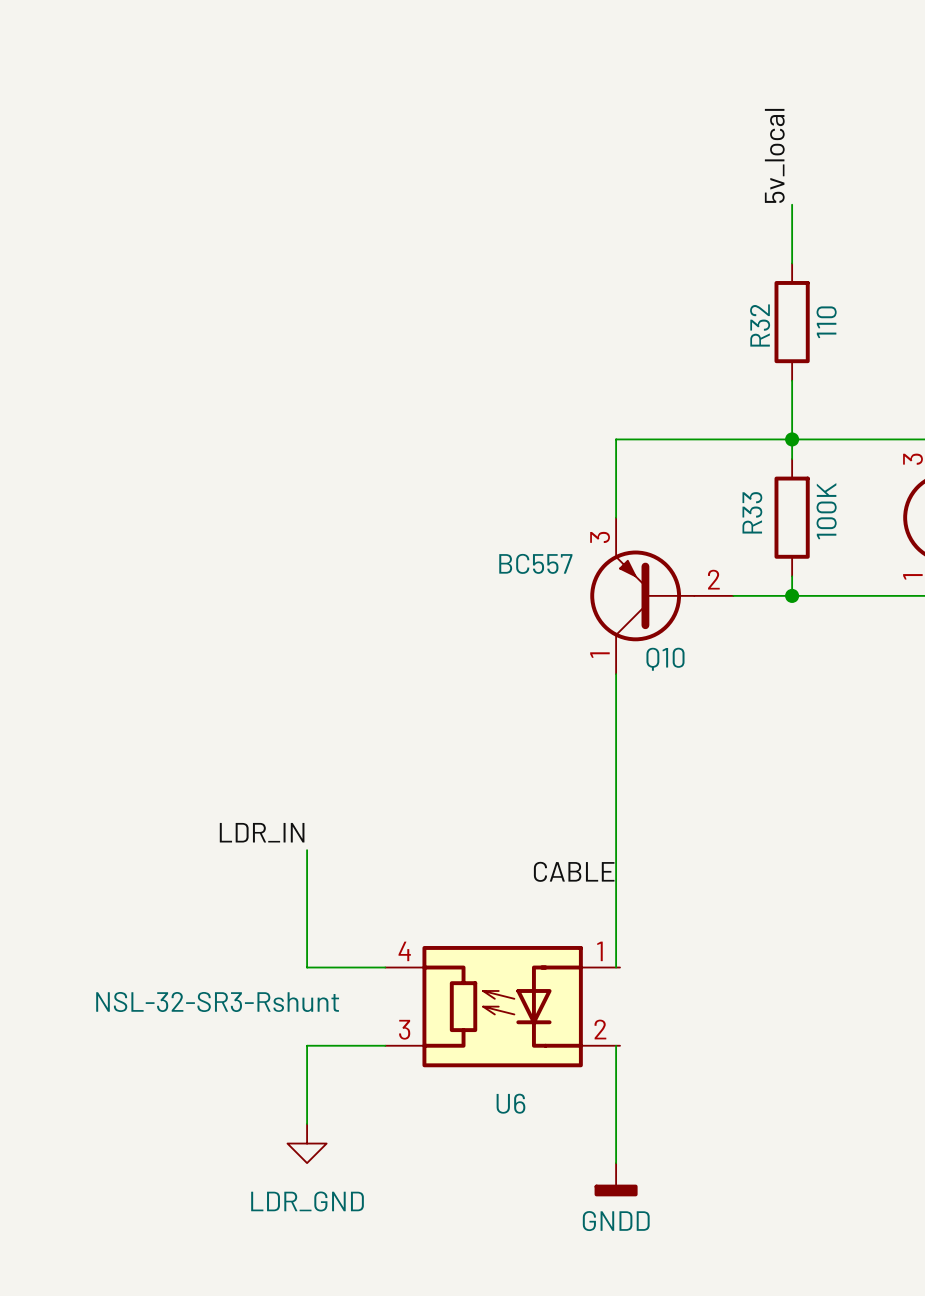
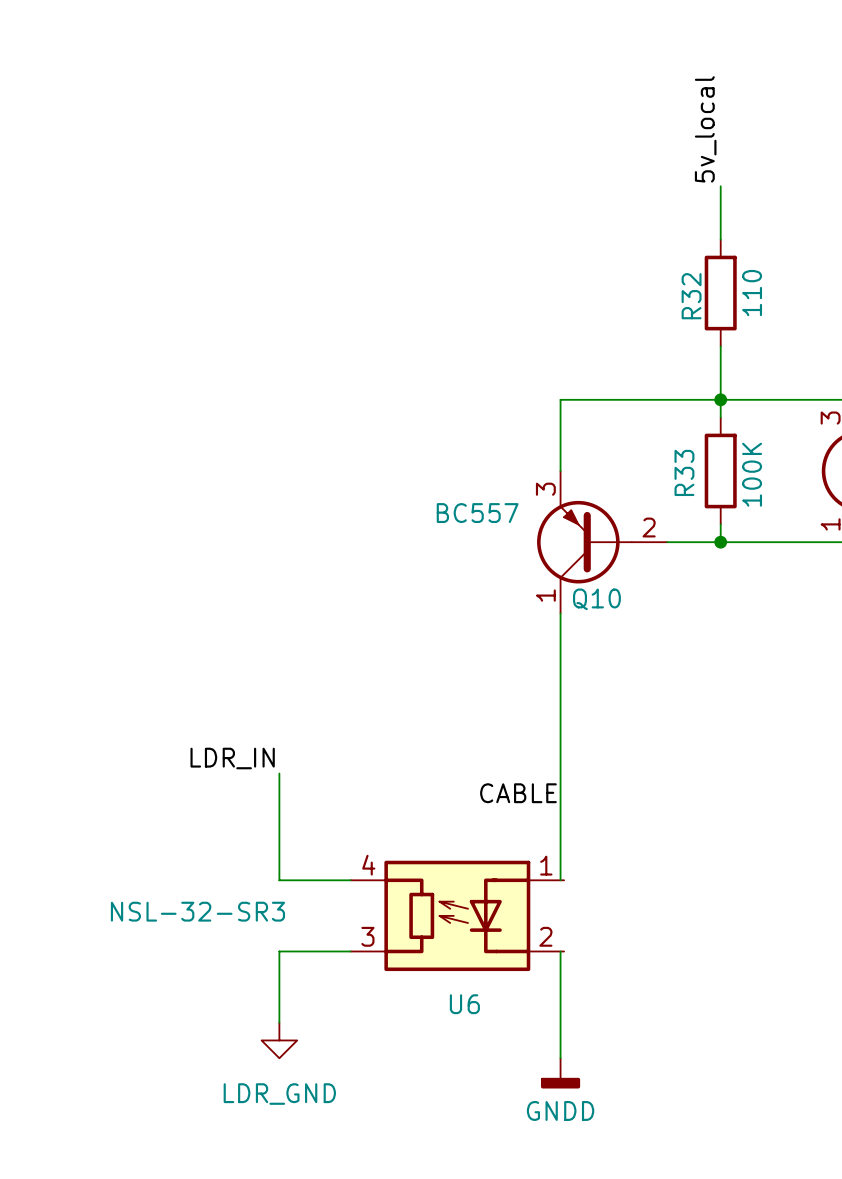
U6 value: NSL-32-SR3-Rshunt (217, 1001) -> NSL-32-SR3 (197, 911)

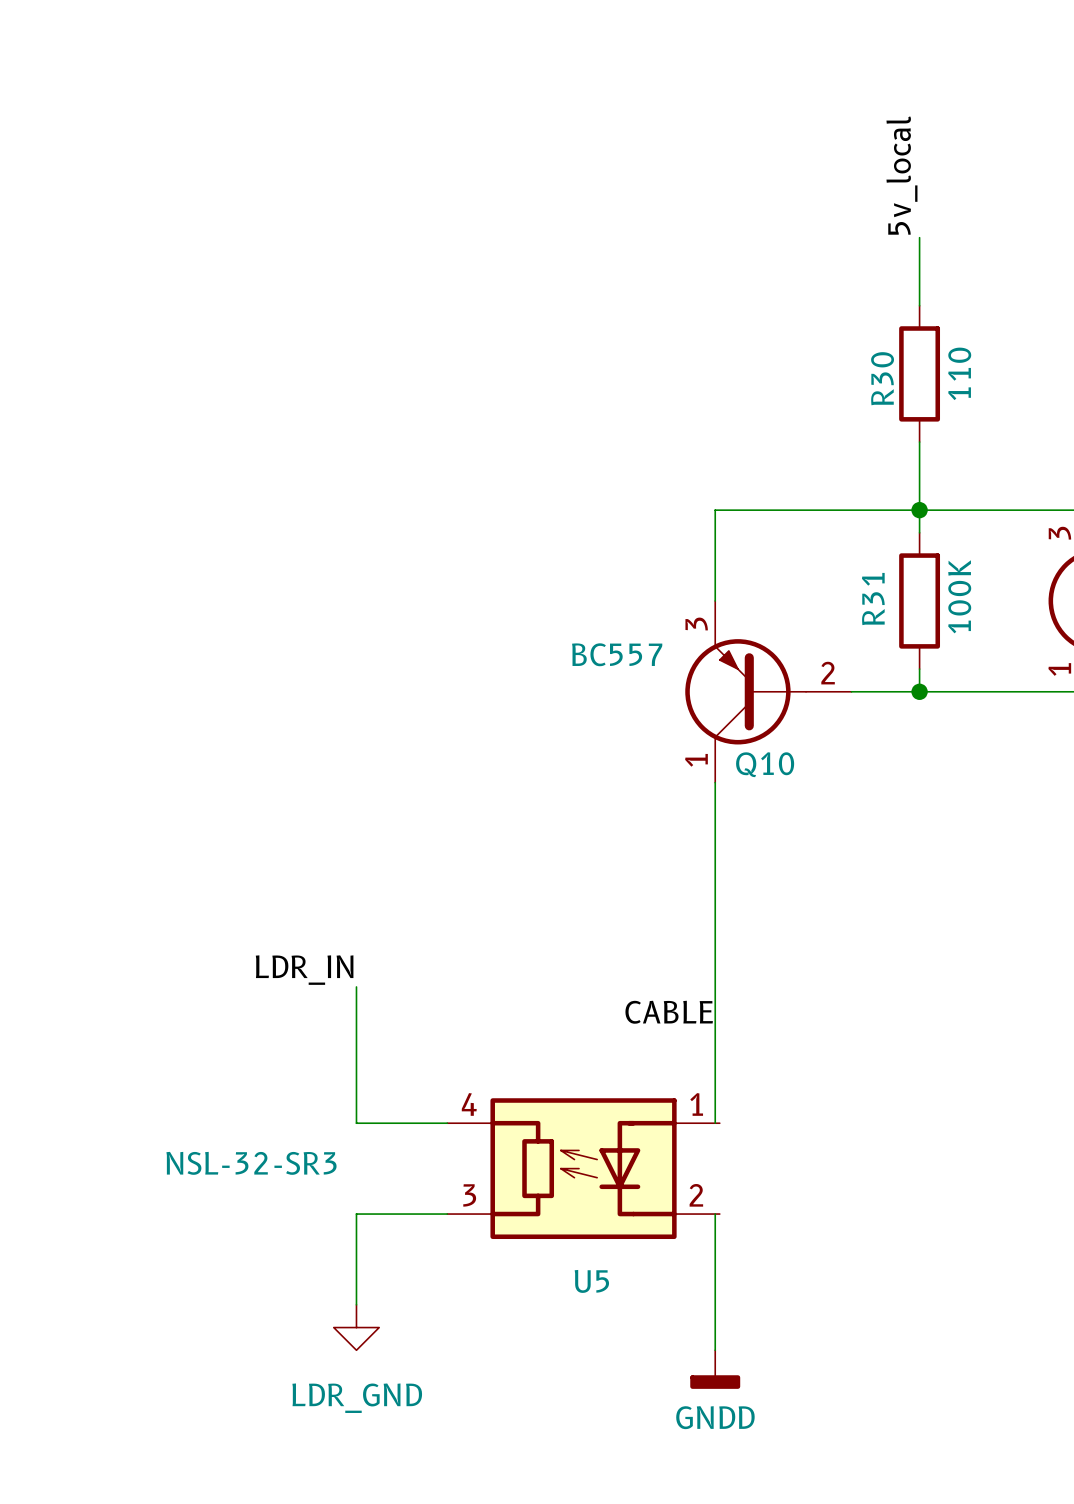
R32 name: R32 (691, 296) -> R30 (882, 378)
R33 name: R33 (684, 472) -> R31 (873, 599)
U6 name: U6 (464, 1004) -> U5 (591, 1281)

